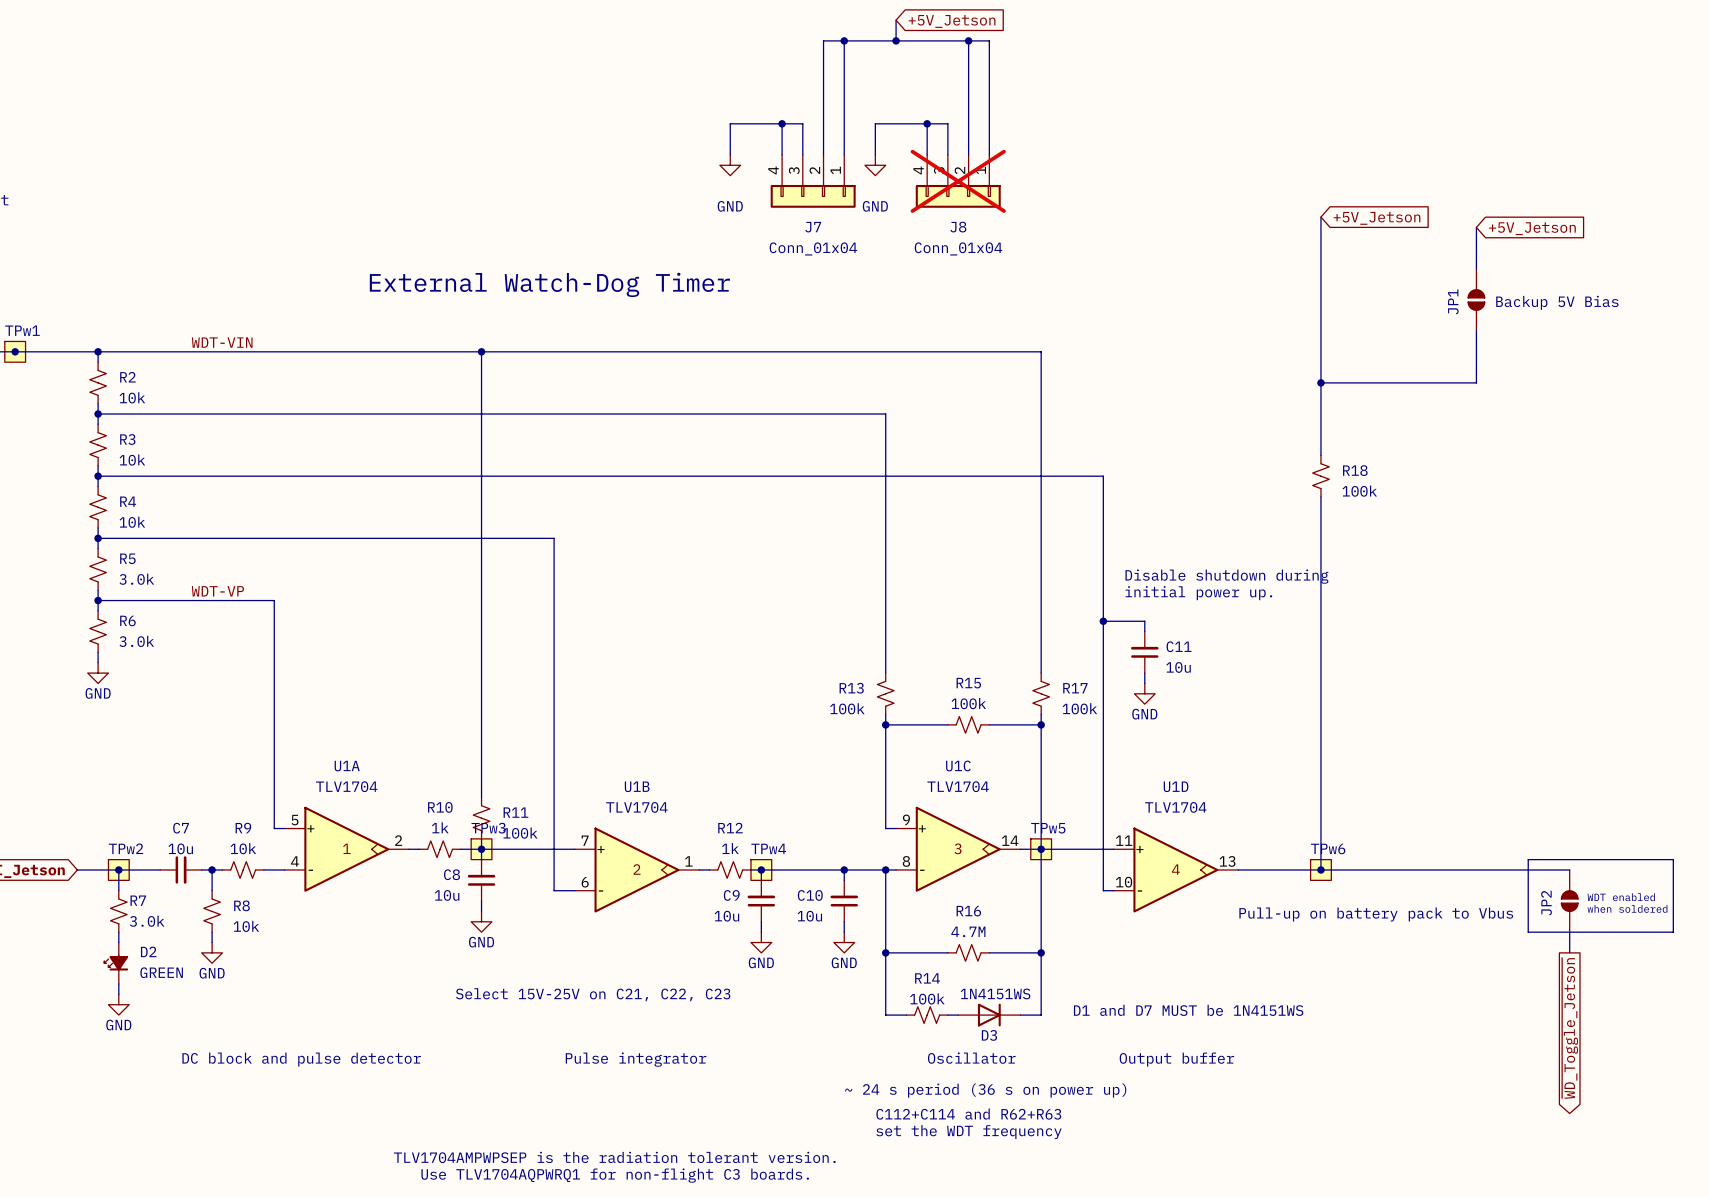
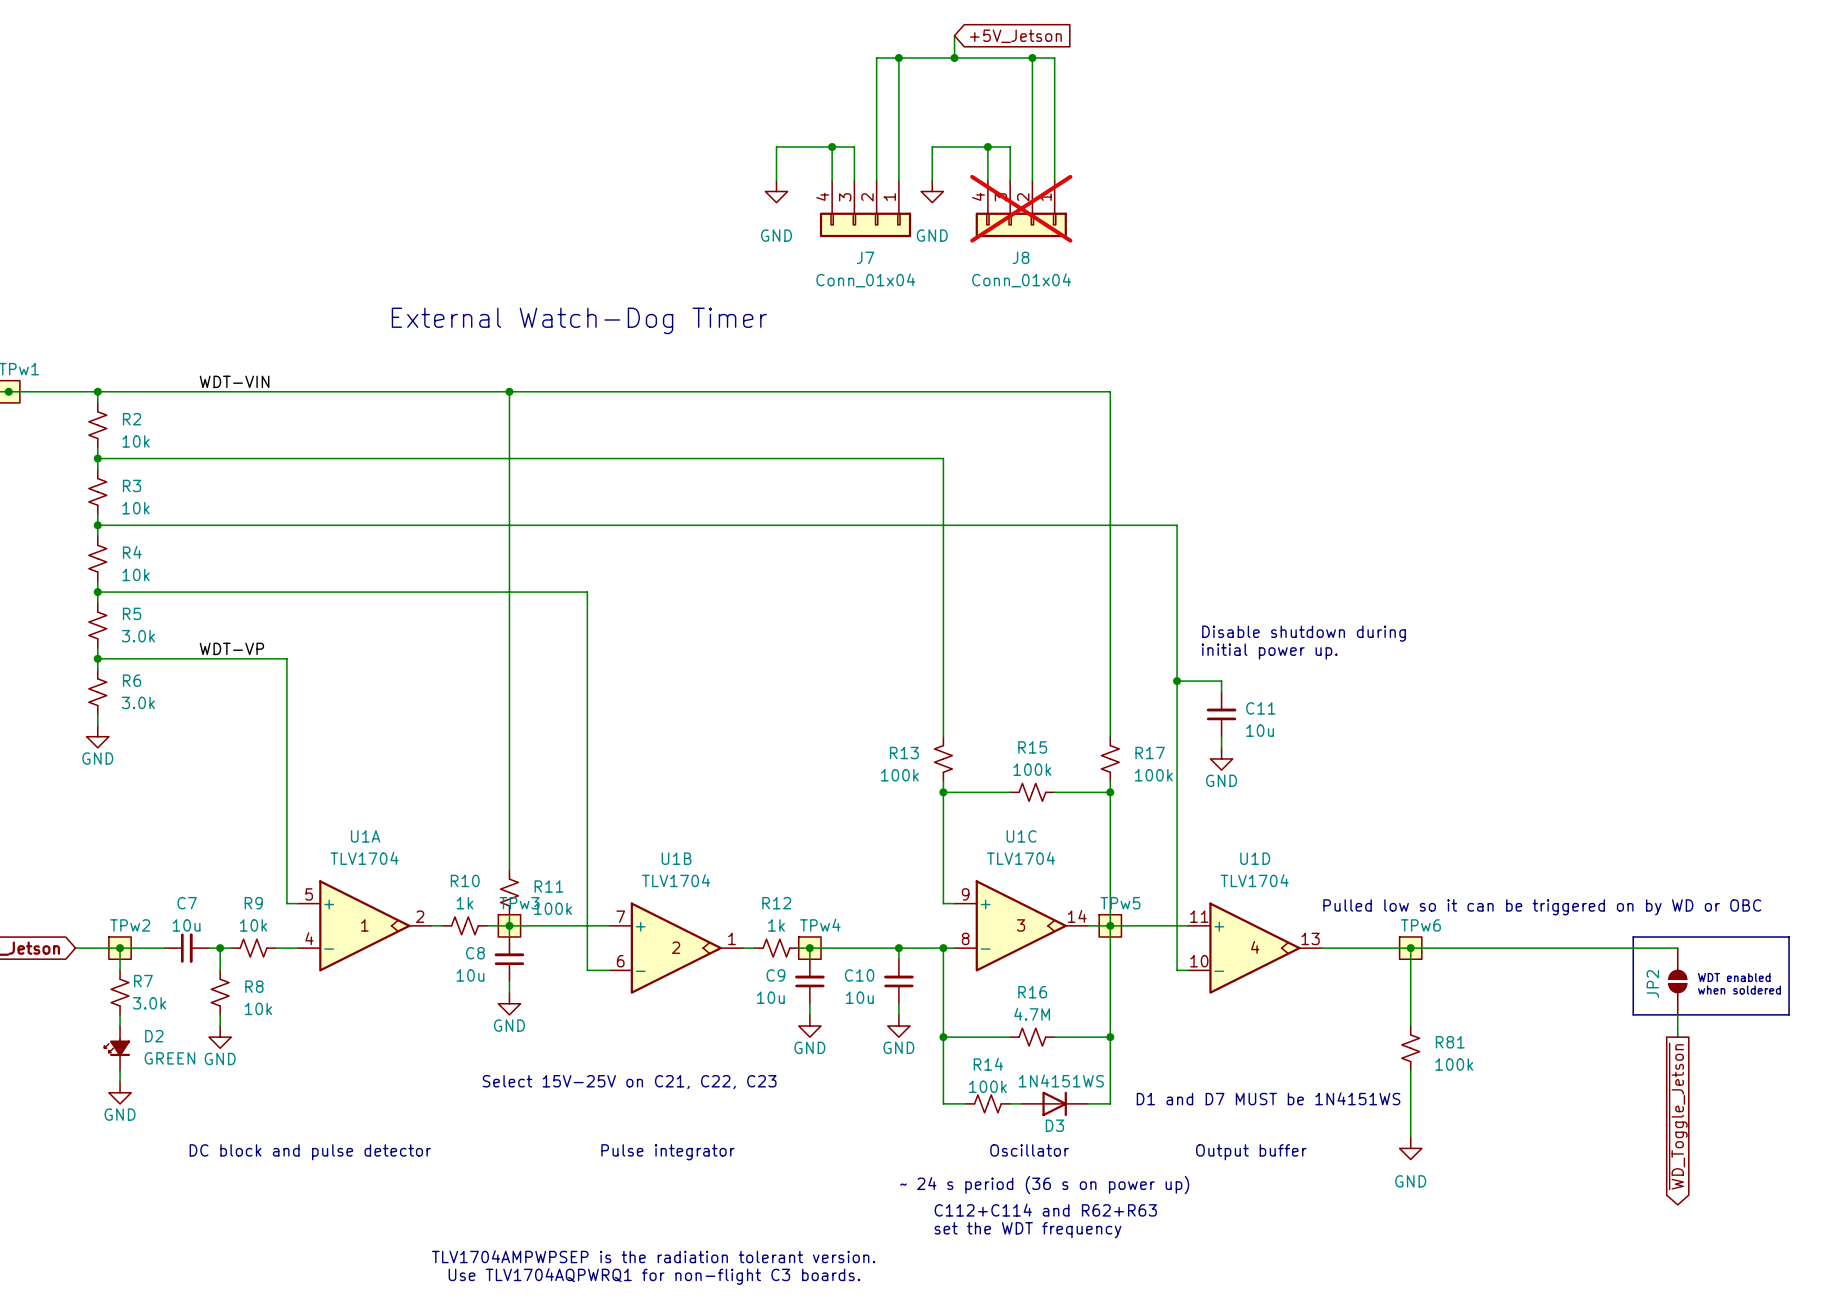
wire: (1320, 217) (1320, 455) -> none
global label: +5V_Jetson (1376, 218) -> none
wire: (1476, 227) (1476, 268) -> none
global label: +5V_Jetson (1532, 228) -> none
JP1: (1476, 300) -> none
text: Backup 5V Bias (1557, 302) -> none
wire: (1476, 331) (1476, 382) (1320, 382) -> none
junction: (1320, 382) -> none
R18: 100k (1320, 476) -> none
wire: (1320, 496) (1320, 869) -> (1410, 1026) (1410, 948)
text: none -> Pulled low so it can be triggered on by WD or OBC (1542, 907)
text: Pull-up on battery pack to Vbus (1376, 914) -> none
R81: none -> 100k (1410, 1048)
wire: none -> (1410, 1070) (1410, 1137)
power symbol: none -> GND (1410, 1148)

